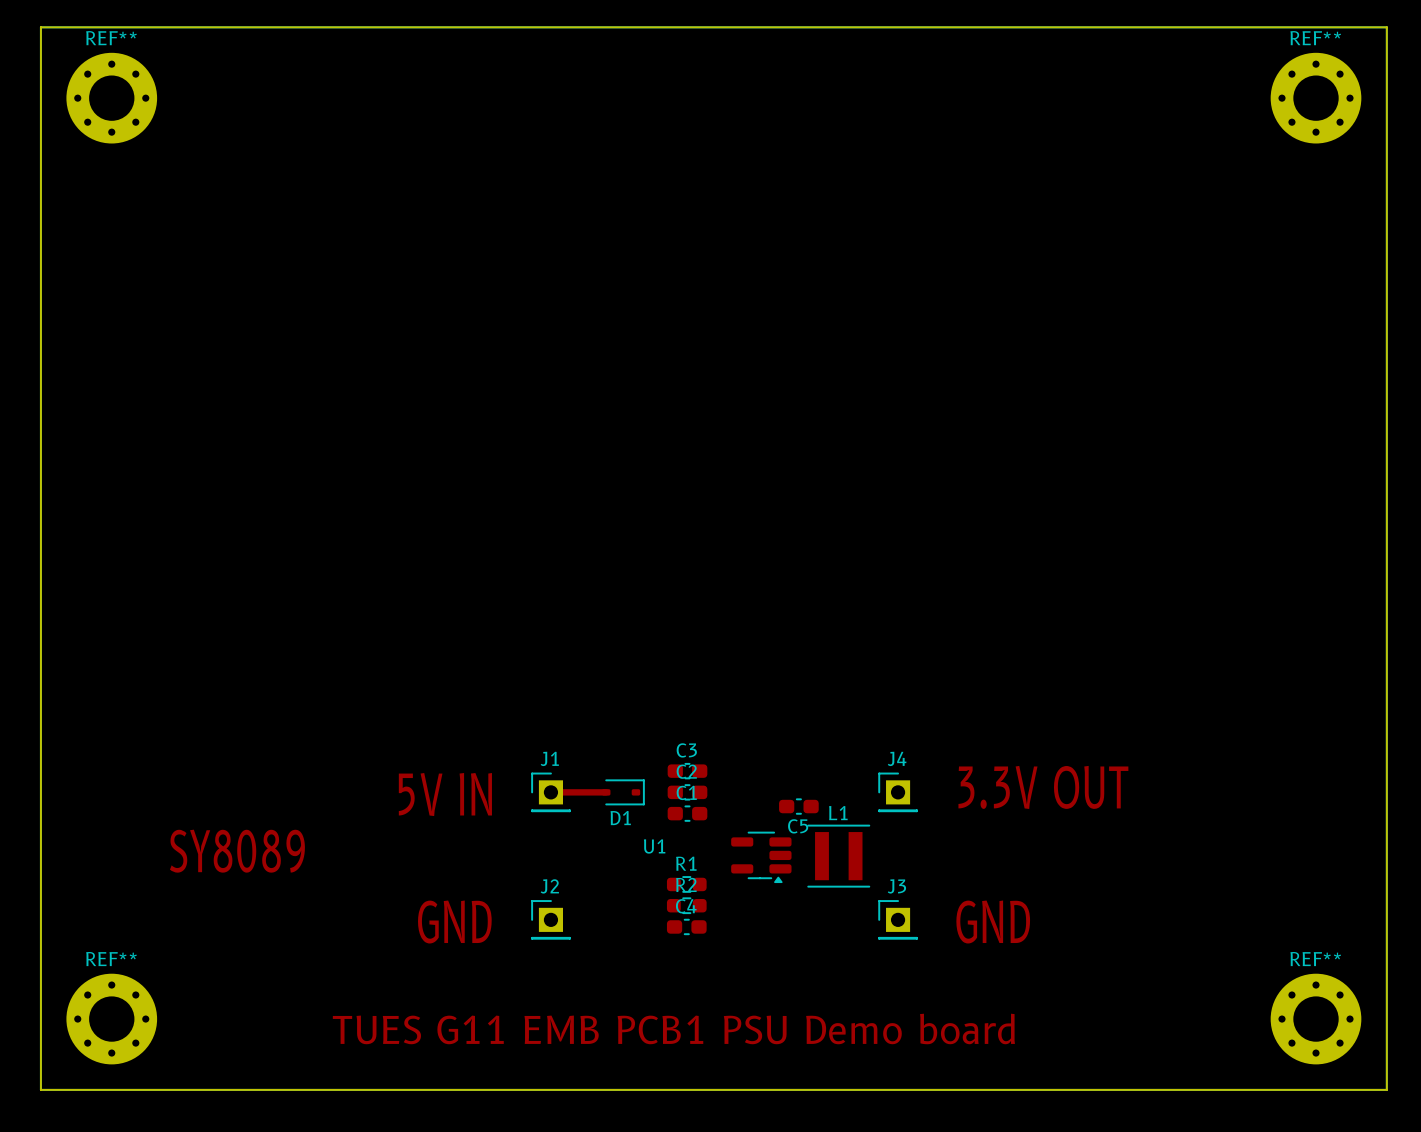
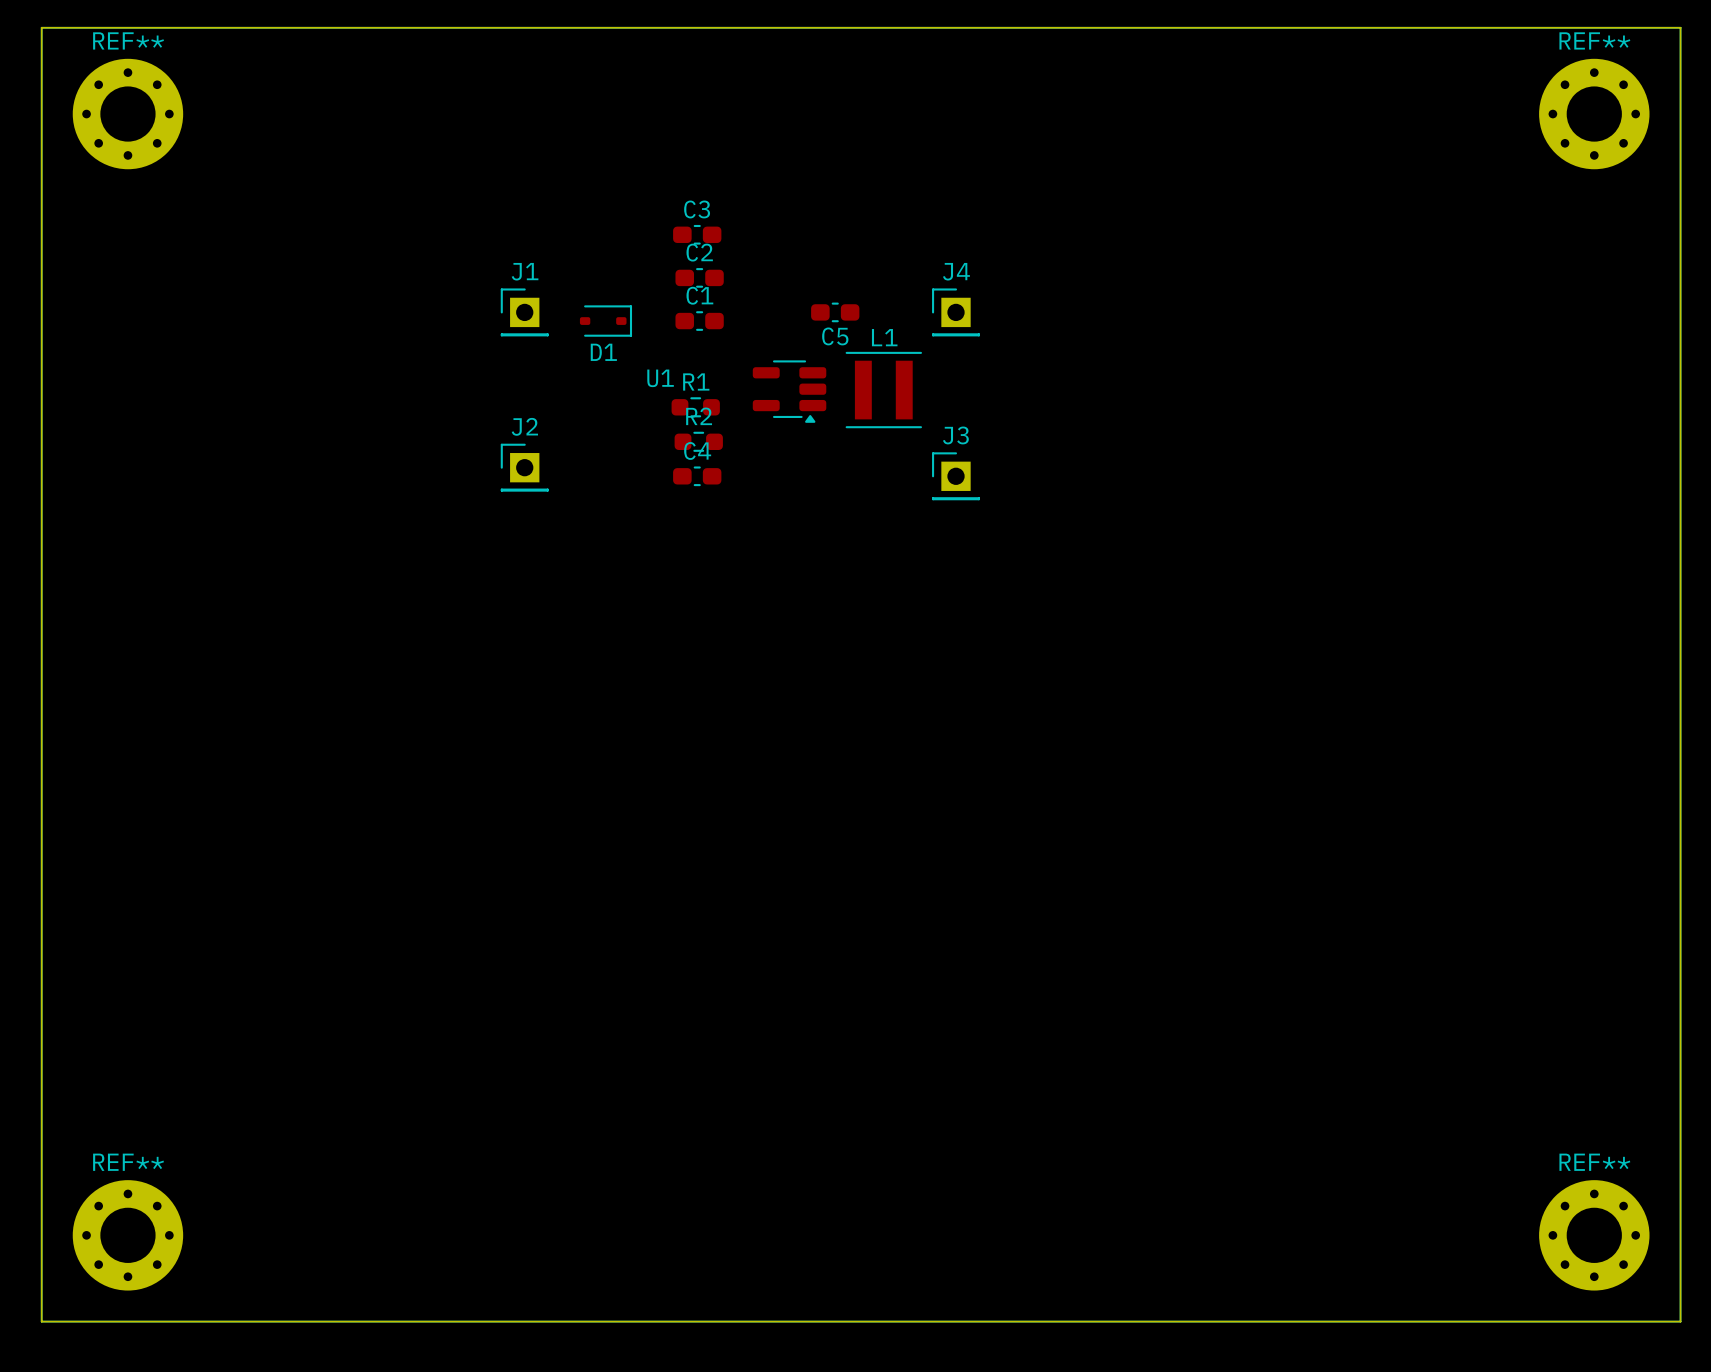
C3 position: (687, 771) -> (697, 234)
text: 3.3V OUT (1043, 787) -> none
top track: (550, 792) (606, 792) -> none
J1 position: (550, 792) -> (524, 312)
D1 position: (623, 792) -> (605, 321)
C2 position: (687, 792) -> (699, 277)
J4 position: (898, 792) -> (956, 312)
text: 5V IN (445, 794) -> none
C5 position: (798, 806) -> (835, 312)
C1 position: (687, 813) -> (699, 321)
text: SY8089 (237, 851) -> none
L1 position: (838, 856) -> (883, 390)
U1 position: (761, 857) -> (789, 391)
R1 position: (686, 884) -> (695, 407)
R2 position: (686, 905) -> (698, 441)
J2 position: (550, 919) -> (524, 467)
J3 position: (898, 919) -> (956, 476)
text: GND (454, 922) -> none
text: GND (993, 922) -> none
C4 position: (686, 926) -> (697, 476)
text: TUES G11 EMB PCB1 PSU Demo board (673, 1028) -> none

